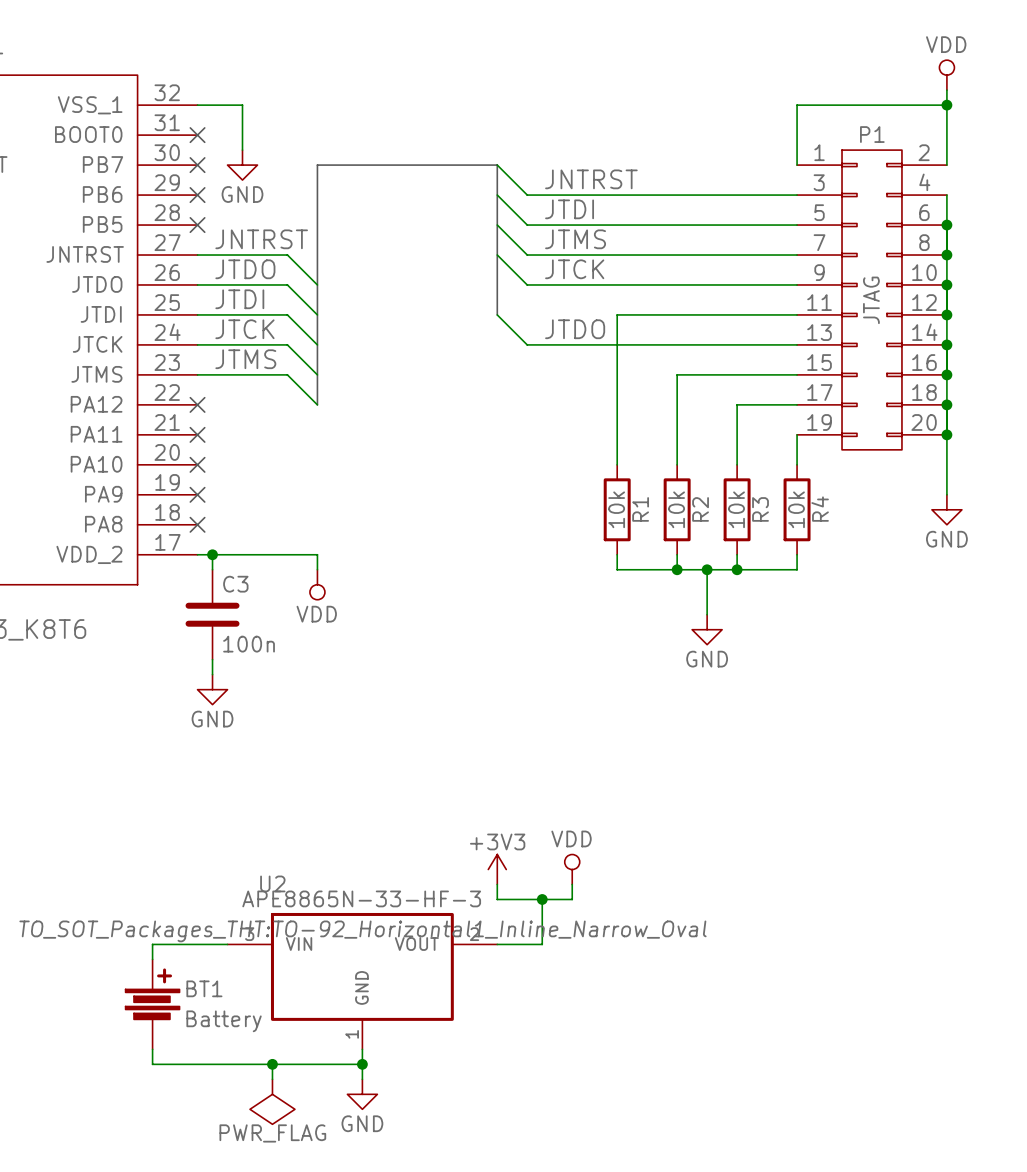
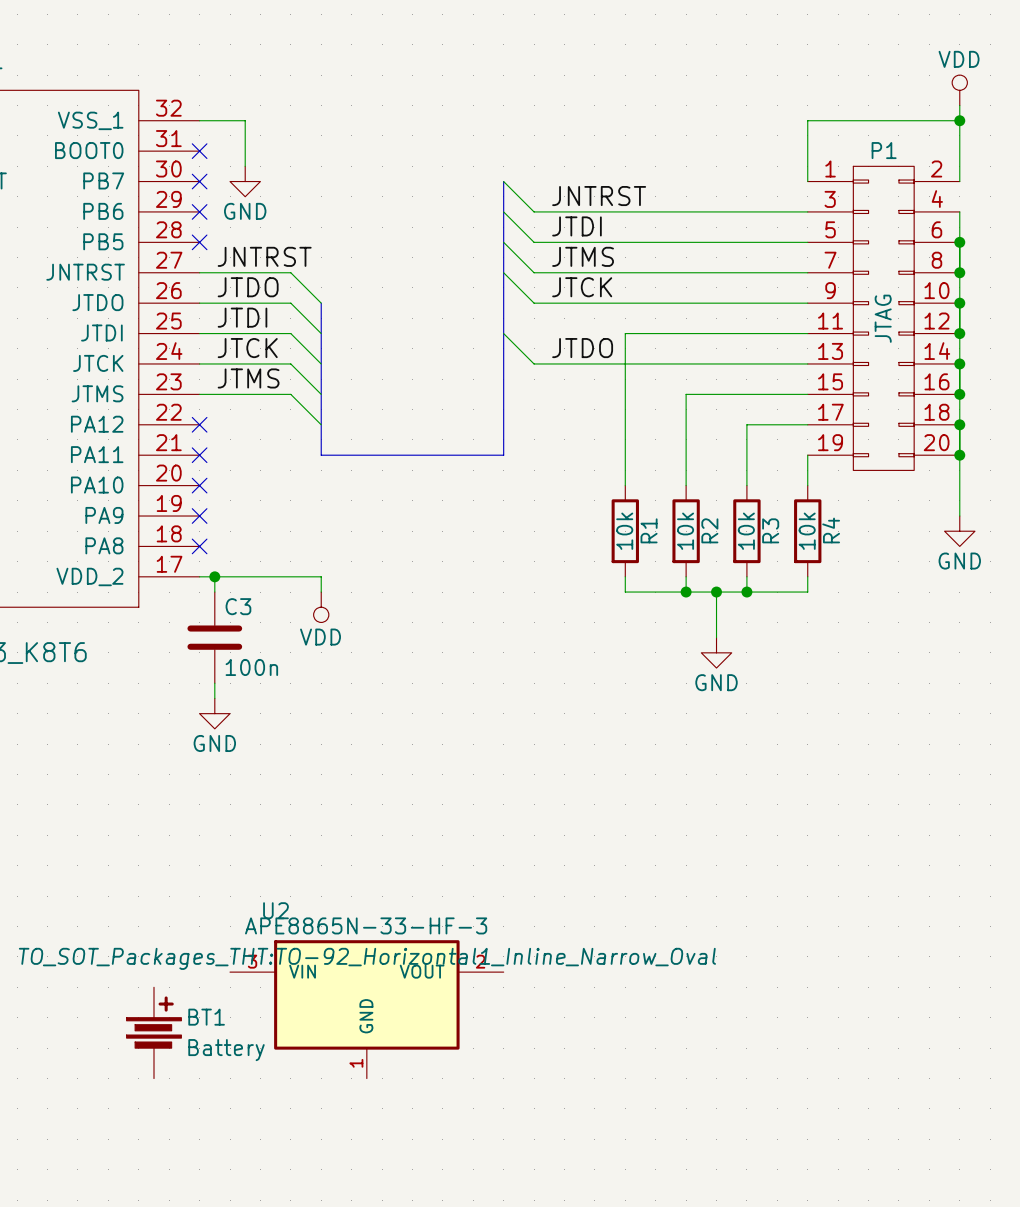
bus: (497, 165) (317, 165) (317, 284) -> none
bus: none -> (503, 333) (503, 455) (321, 455) (321, 424)
power symbol: +3V3 (497, 869) -> none
power symbol: VDD (572, 869) -> none
wire: (497, 884) (497, 899) (572, 899) (572, 884) -> none
wire: (542, 899) (542, 944) (497, 944) -> none
junction: (542, 899) -> none
wire: (227, 944) (152, 944) (152, 959) -> none
wire: (152, 1049) (152, 1064) (362, 1064) -> none
wire: (362, 1049) (362, 1079) -> none
wire: (272, 1064) (272, 1079) -> none
junction: (272, 1064) -> none
junction: (362, 1064) -> none
power symbol: GND (362, 1094) -> none
power symbol: PWR_FLAG (272, 1101) -> none

